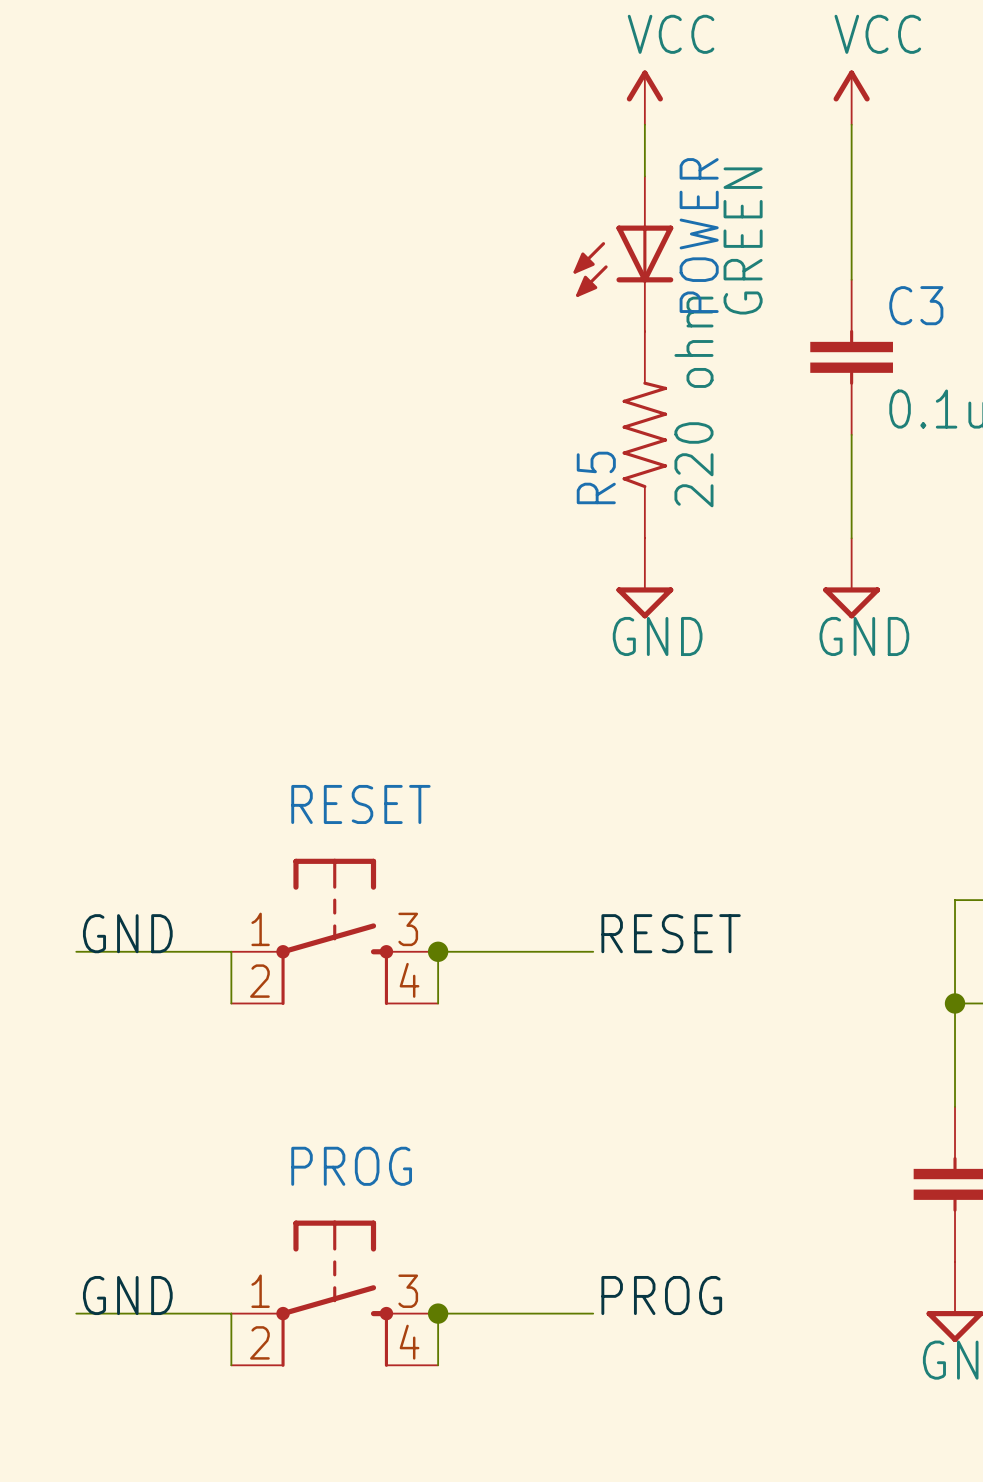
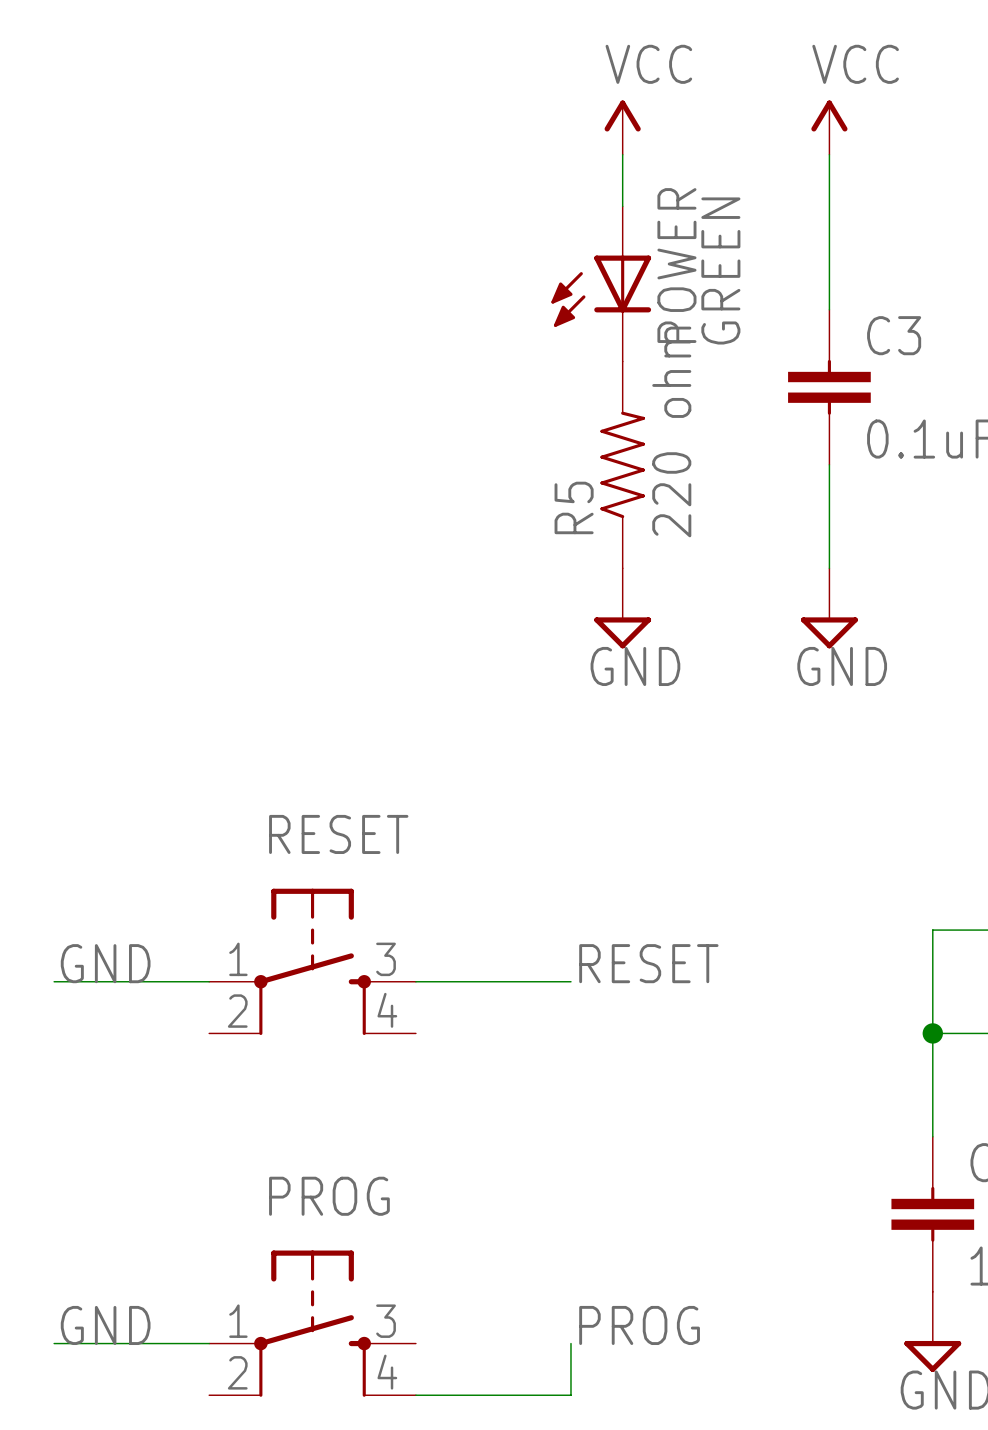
wire: (231, 951) (231, 1003) -> none
wire: (438, 951) (438, 1003) -> none
junction: (438, 951) -> none
wire: (231, 1313) (231, 1365) -> none
junction: (438, 1313) -> none
wire: (593, 1313) (438, 1313) (438, 1365) -> (570, 1343) (570, 1395) (415, 1395)

